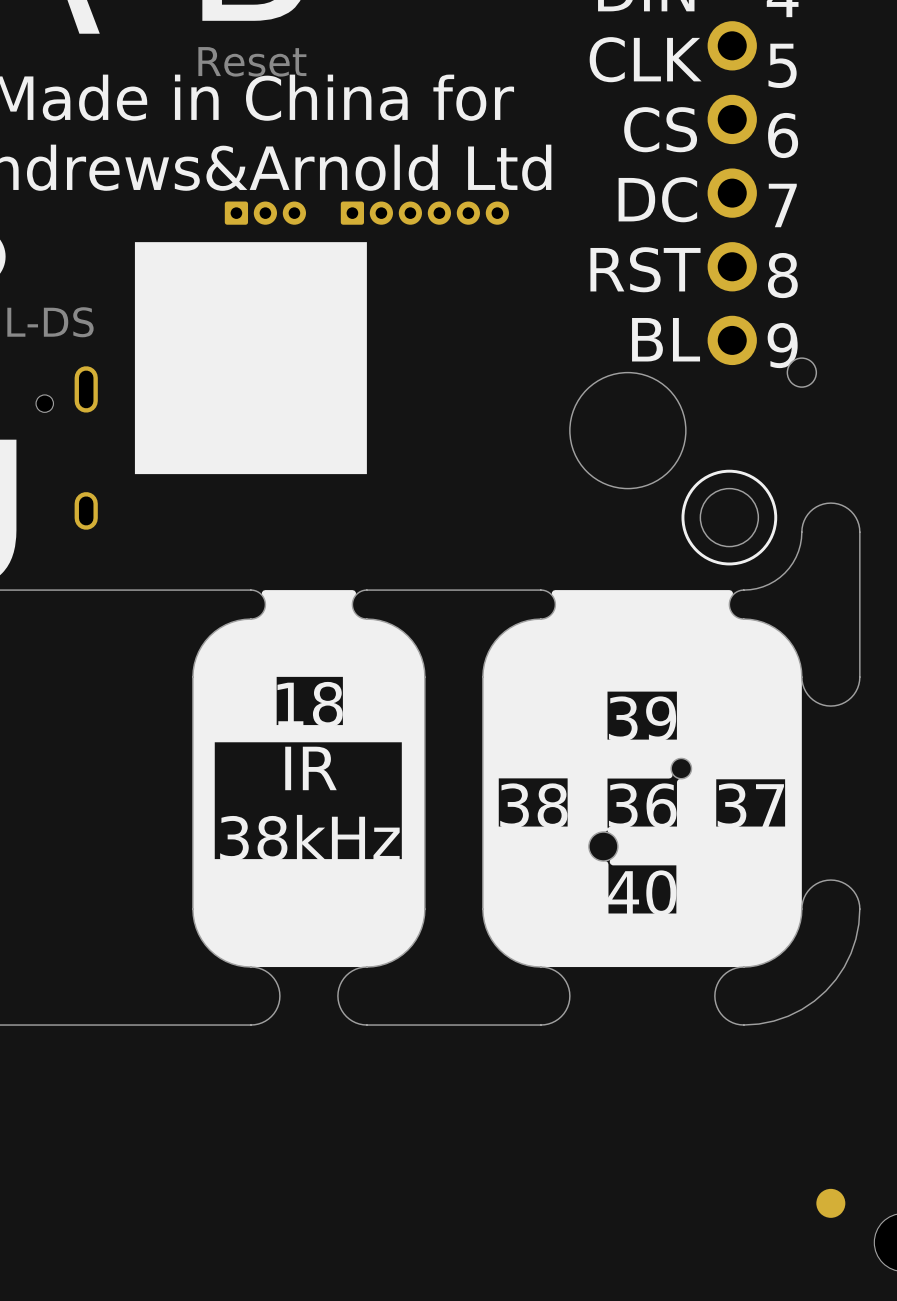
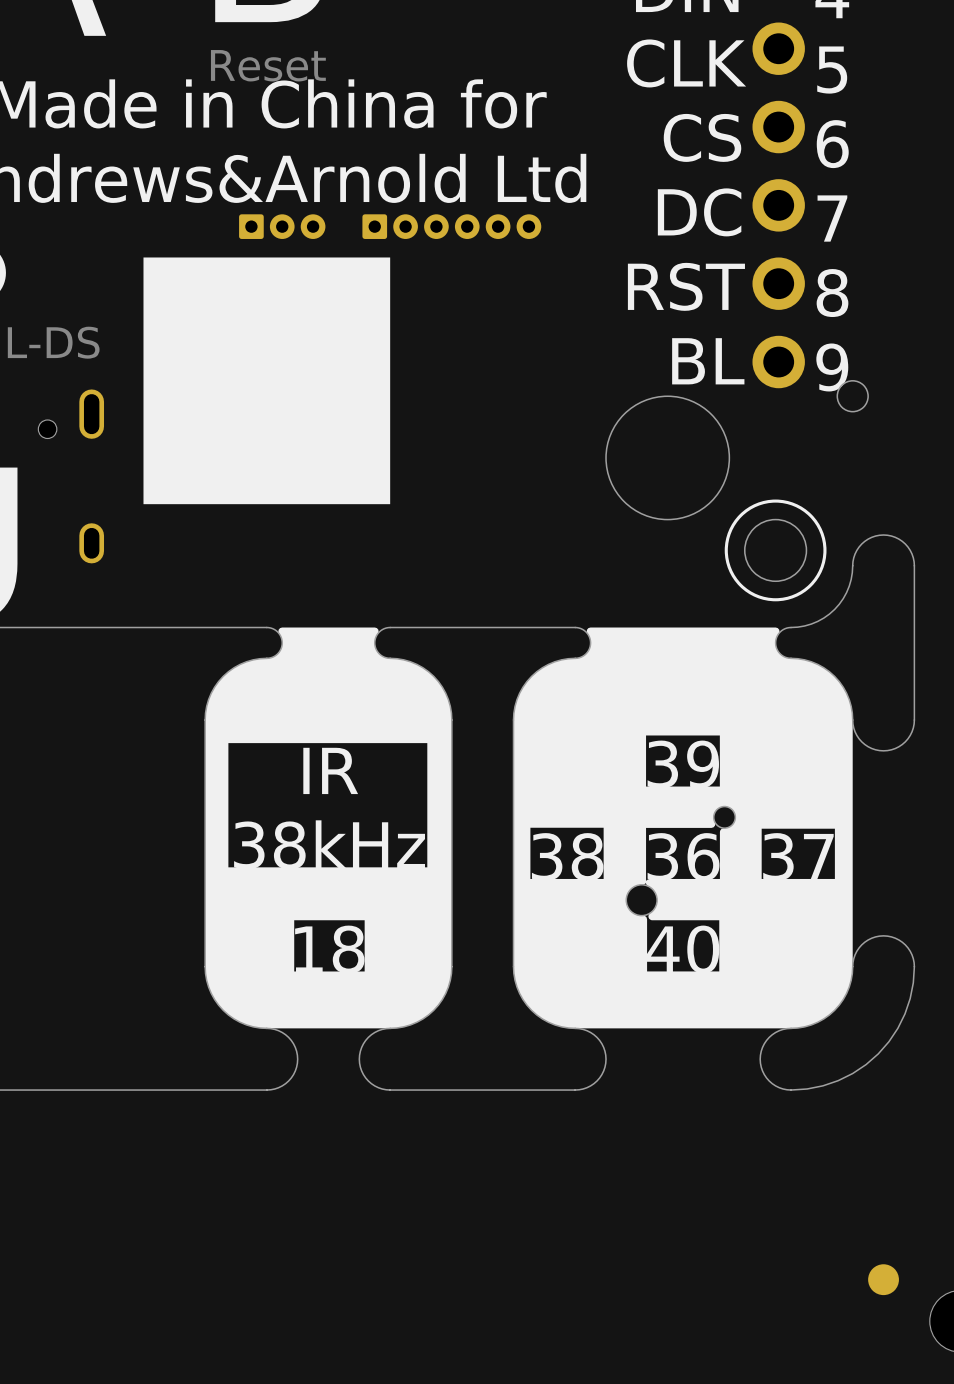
drawing shape: [192, 590, 425, 968] -> [205, 627, 452, 1029]
text position: 18 (310, 704) -> 18 (329, 949)
text position: IR (310, 768) -> IR (330, 770)
text position: 38kHz (309, 837) -> 38kHz (329, 844)

